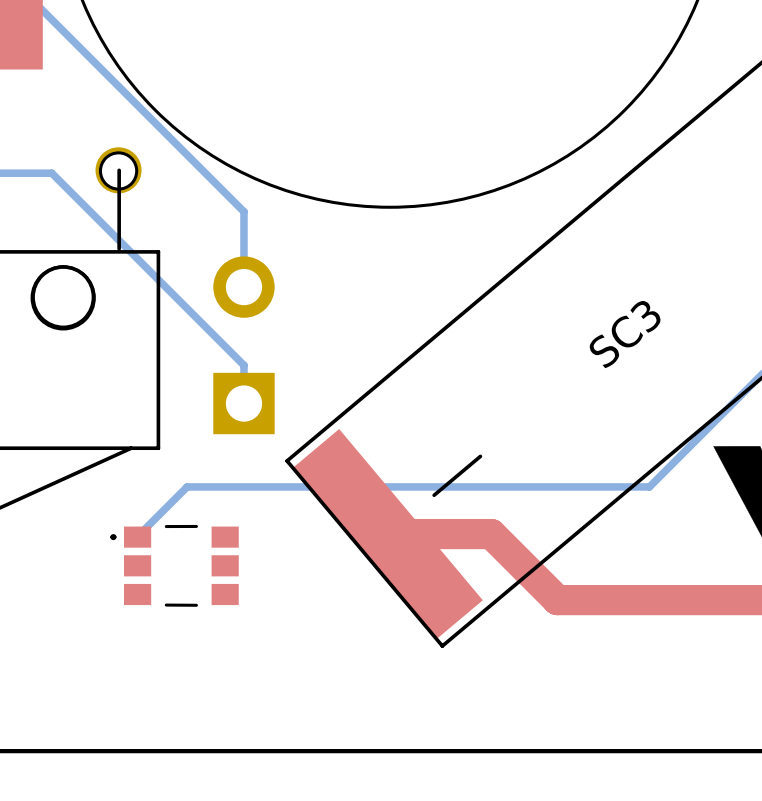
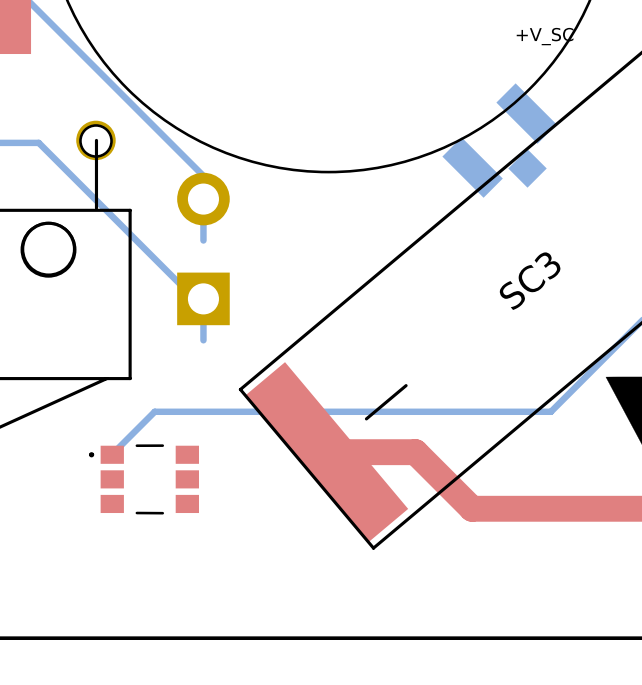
text: none -> +V_SC (545, 36)
part: none -> (499, 140)
part position: (243, 345) -> (203, 248)

